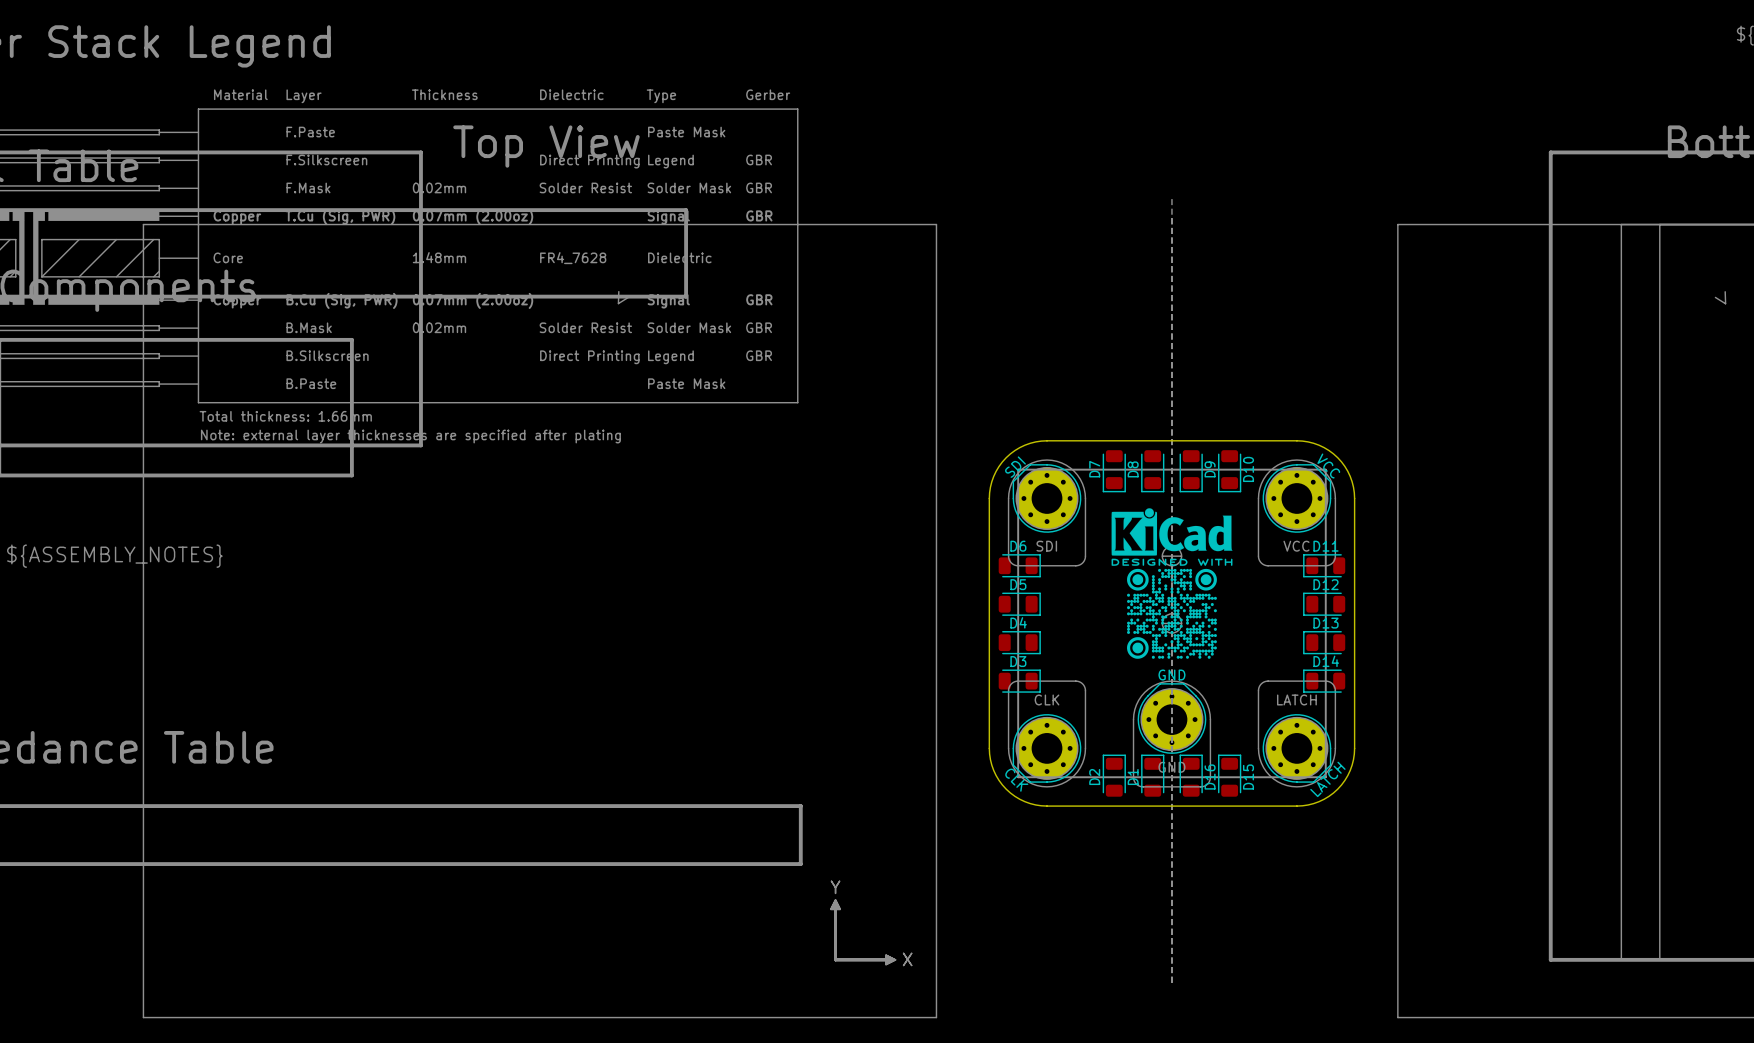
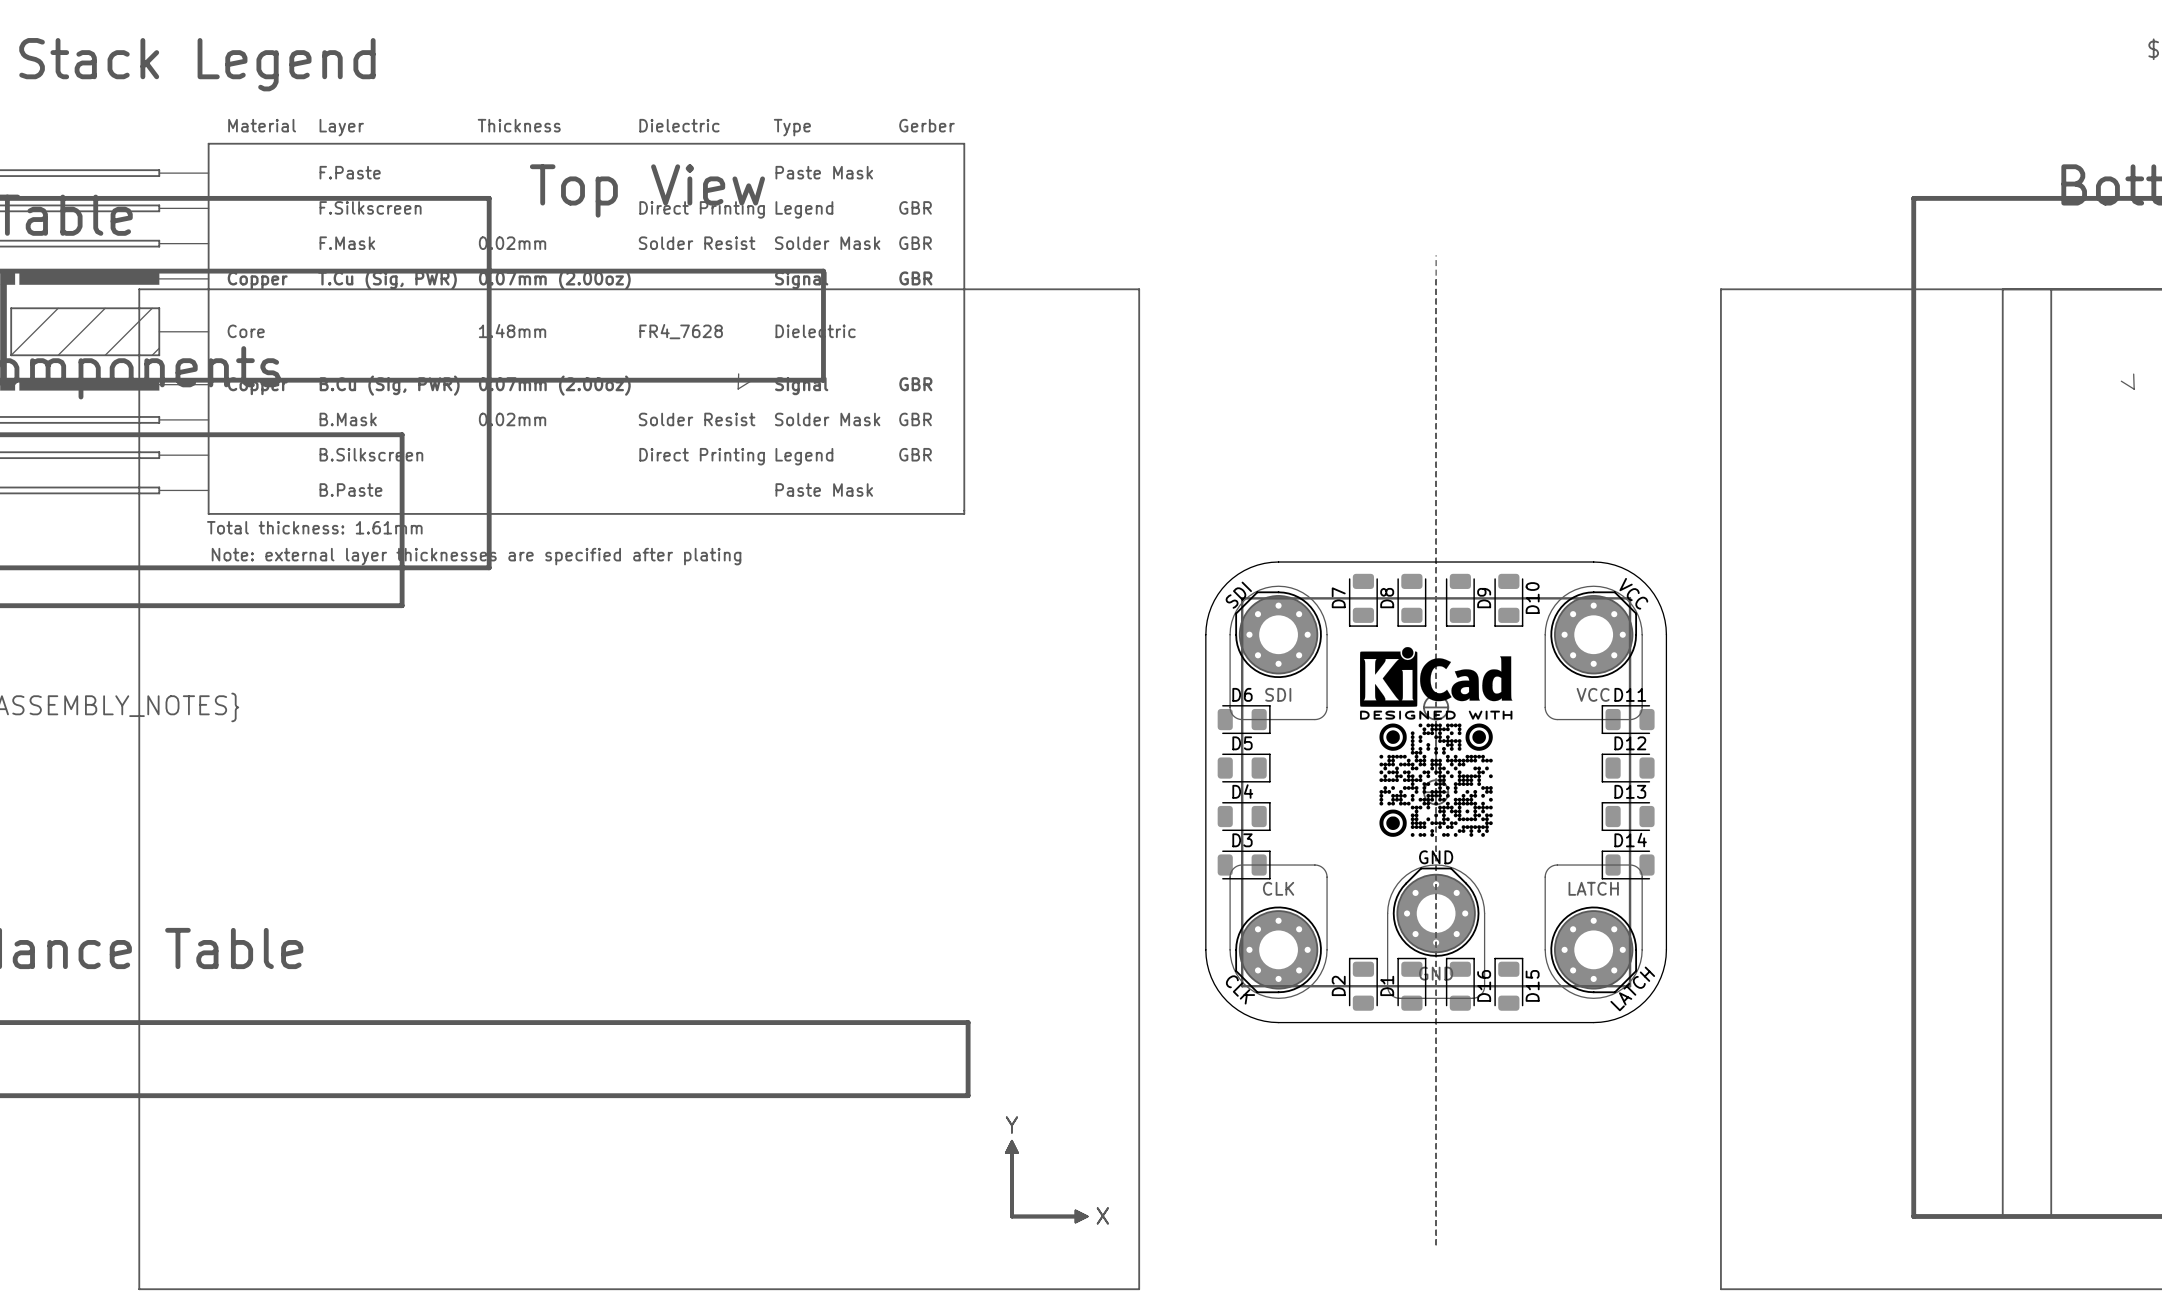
text: Total thickness: 1.66mm (285, 416) -> Total thickness: 1.61mm (314, 527)

